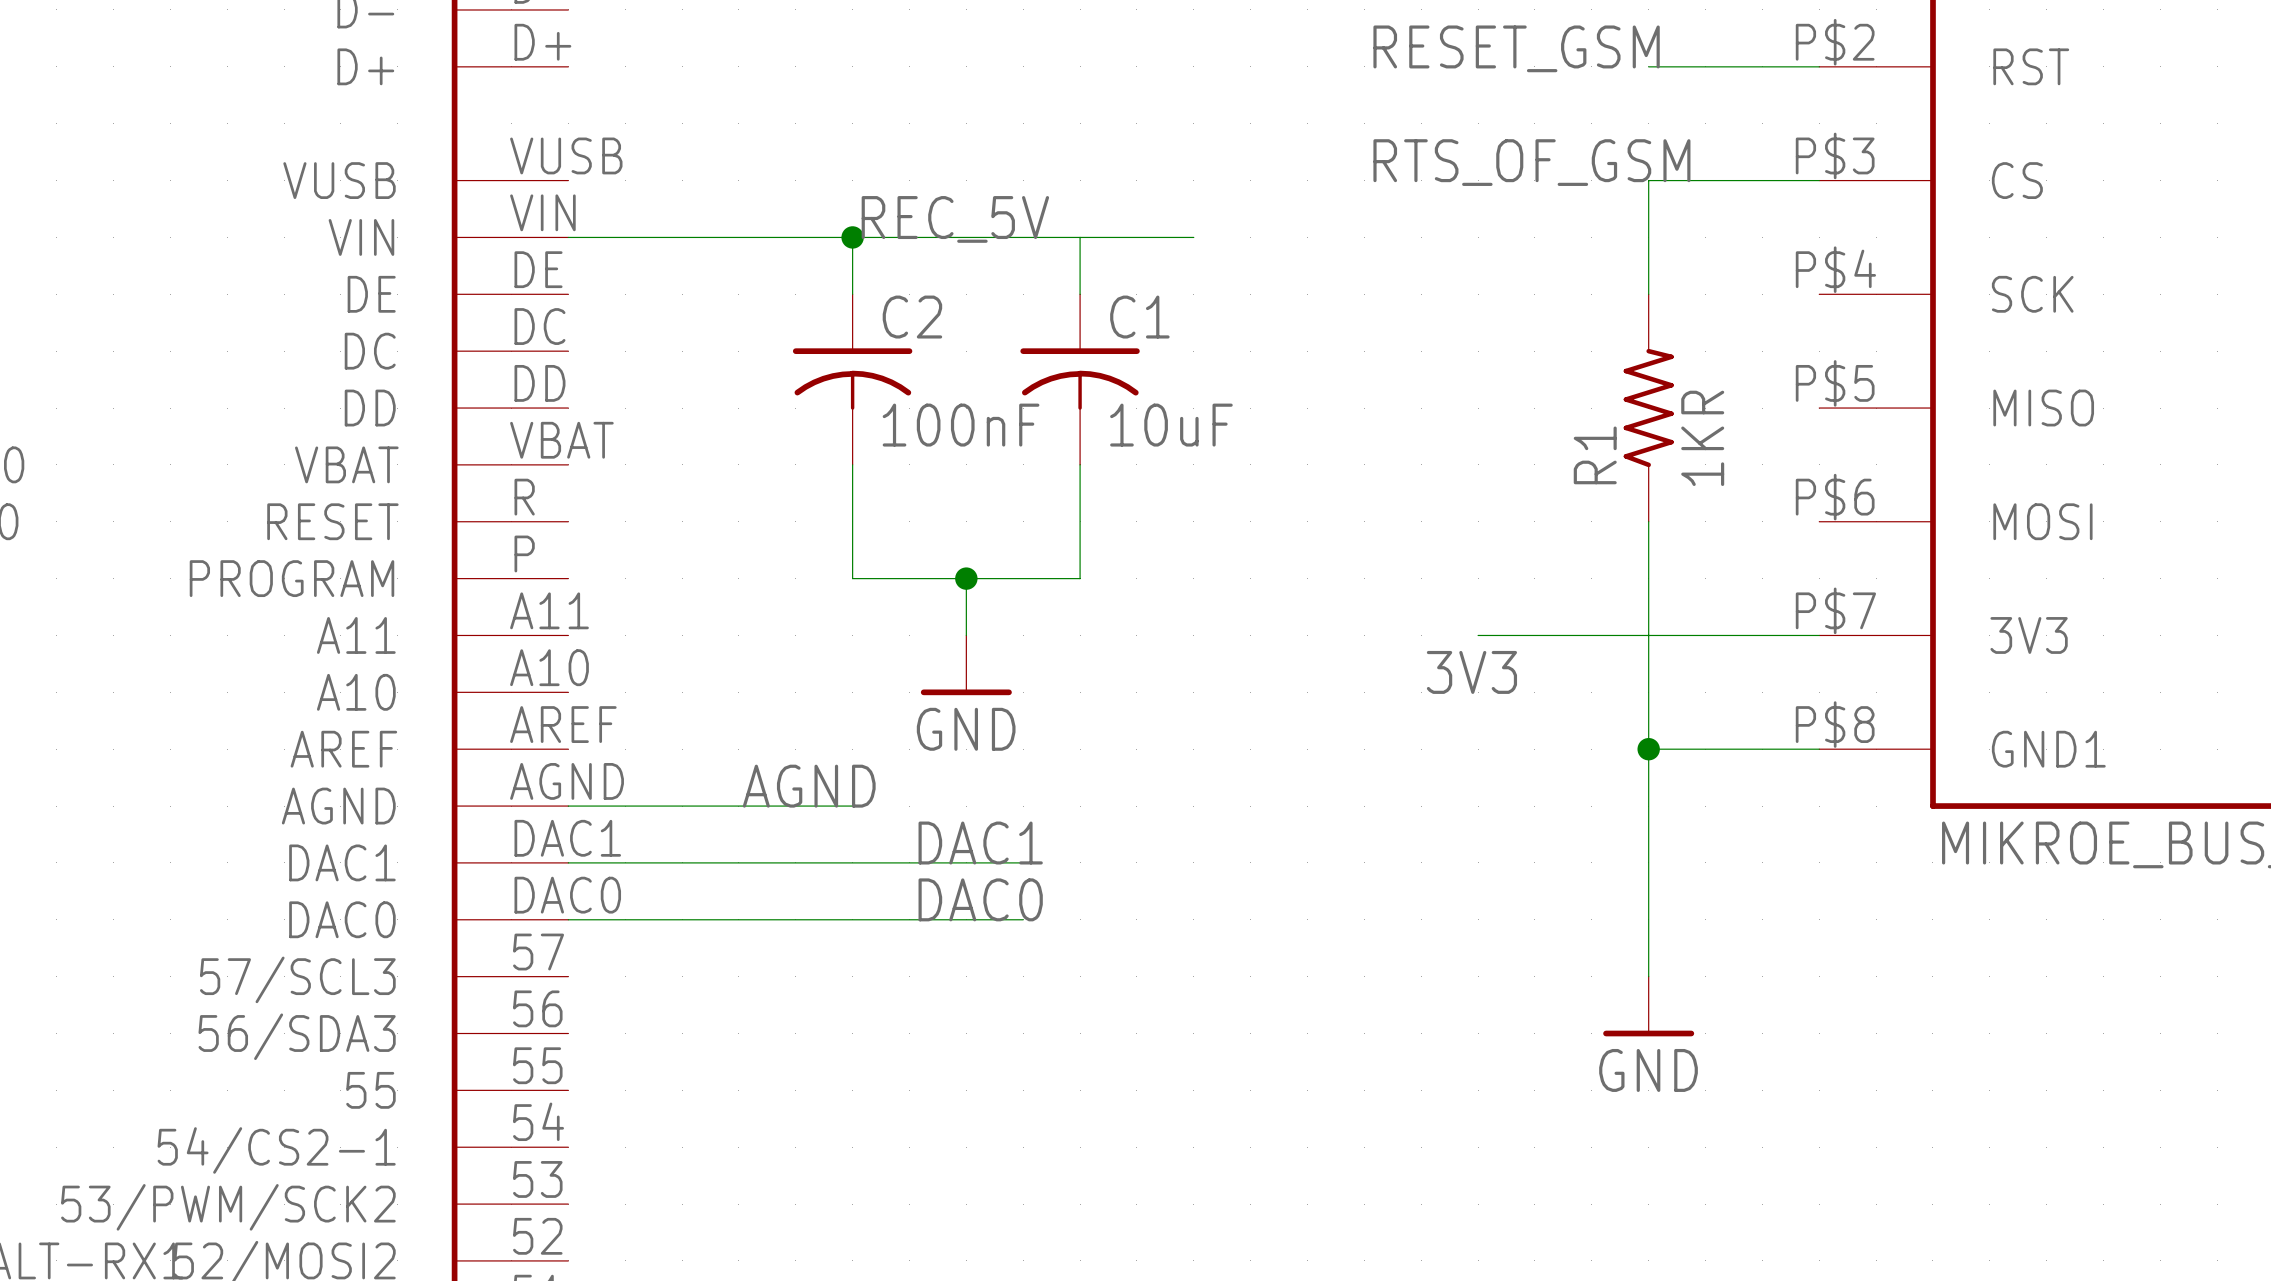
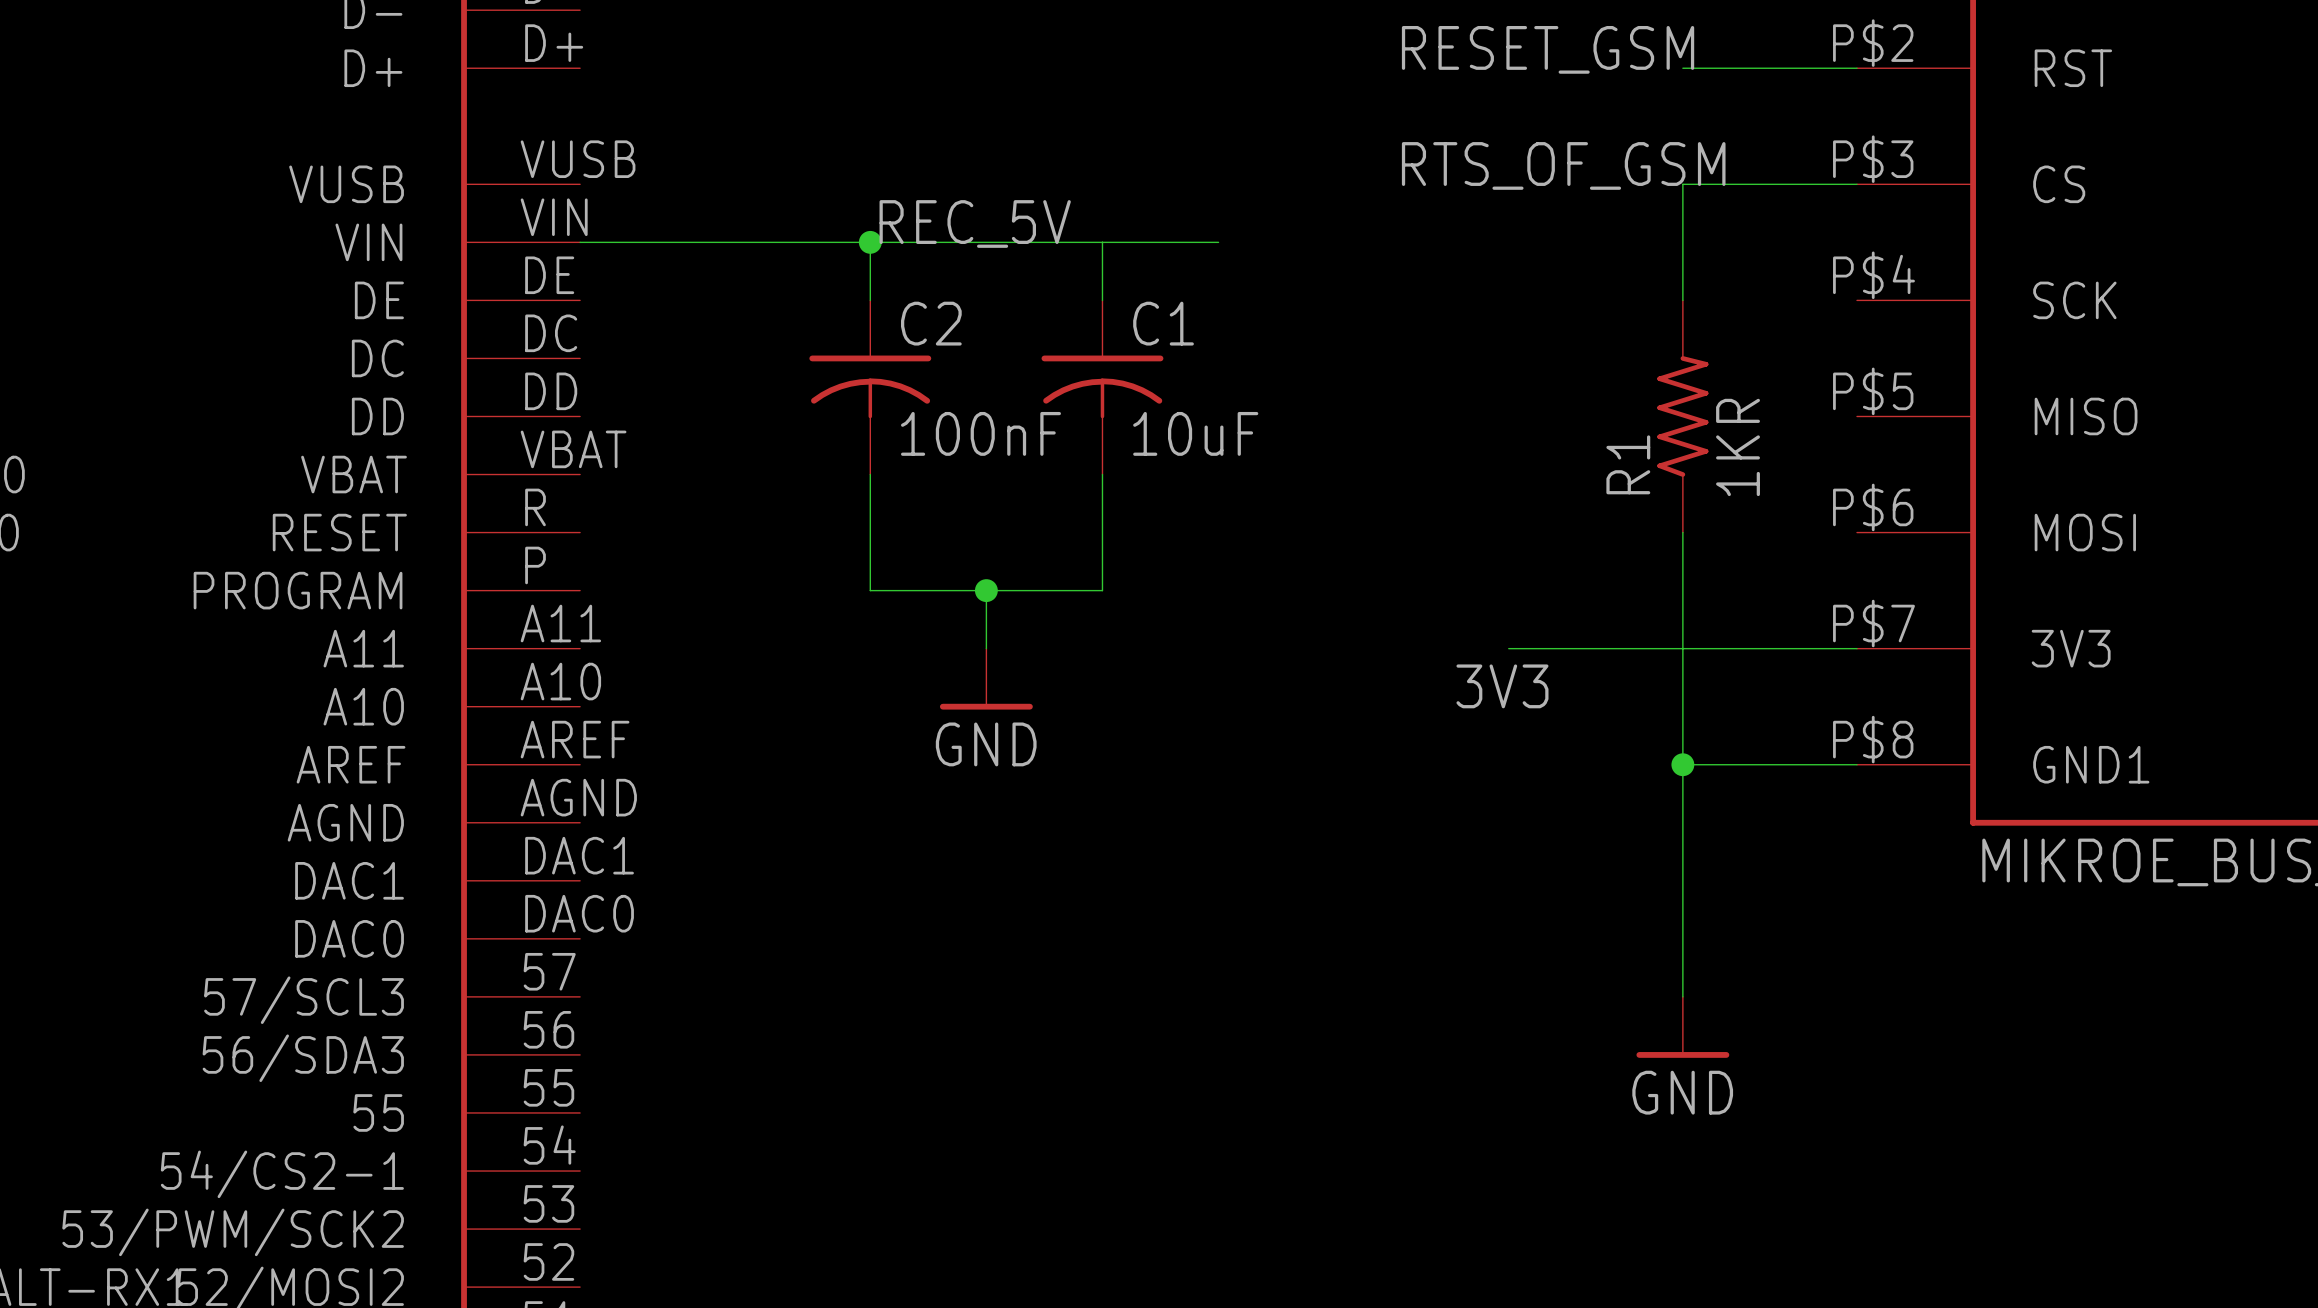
label: AGND (809, 786) -> none
wire: (568, 806) (852, 806) -> none
label: DAC1 (980, 843) -> none
wire: (568, 862) (1023, 862) -> none
label: DAC0 (980, 899) -> none
wire: (568, 919) (1023, 919) -> none

